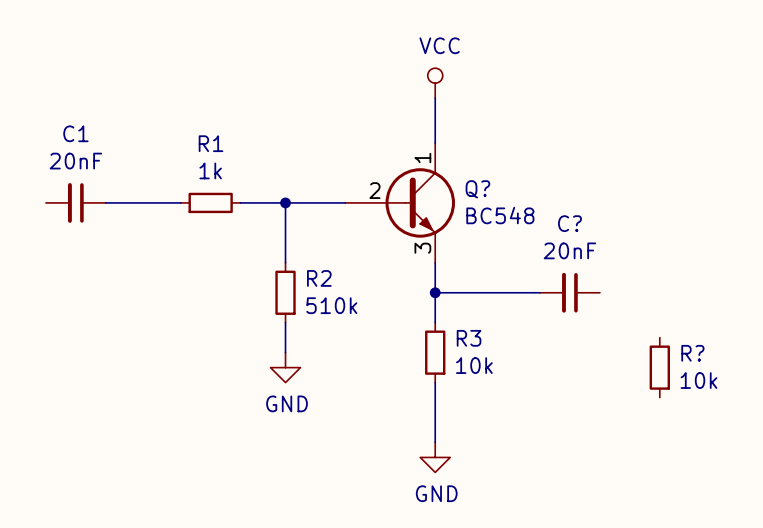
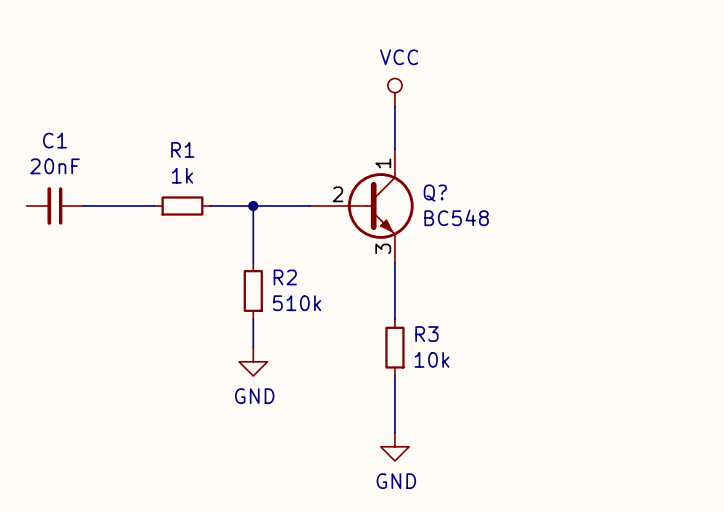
wire: (435, 292) (540, 292) -> none
junction: (435, 292) -> none
C?: 20nF (569, 292) -> none
R?: 10k (659, 367) -> none

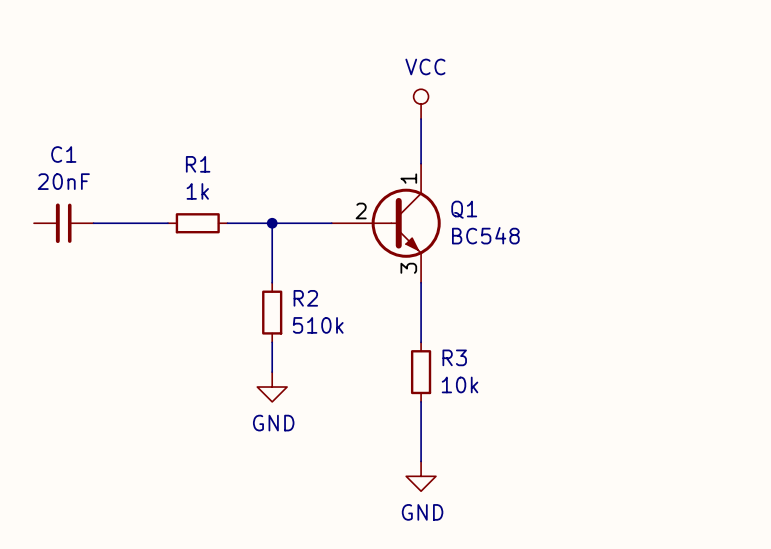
Q? name: Q? (435, 193) -> Q1 (464, 209)

